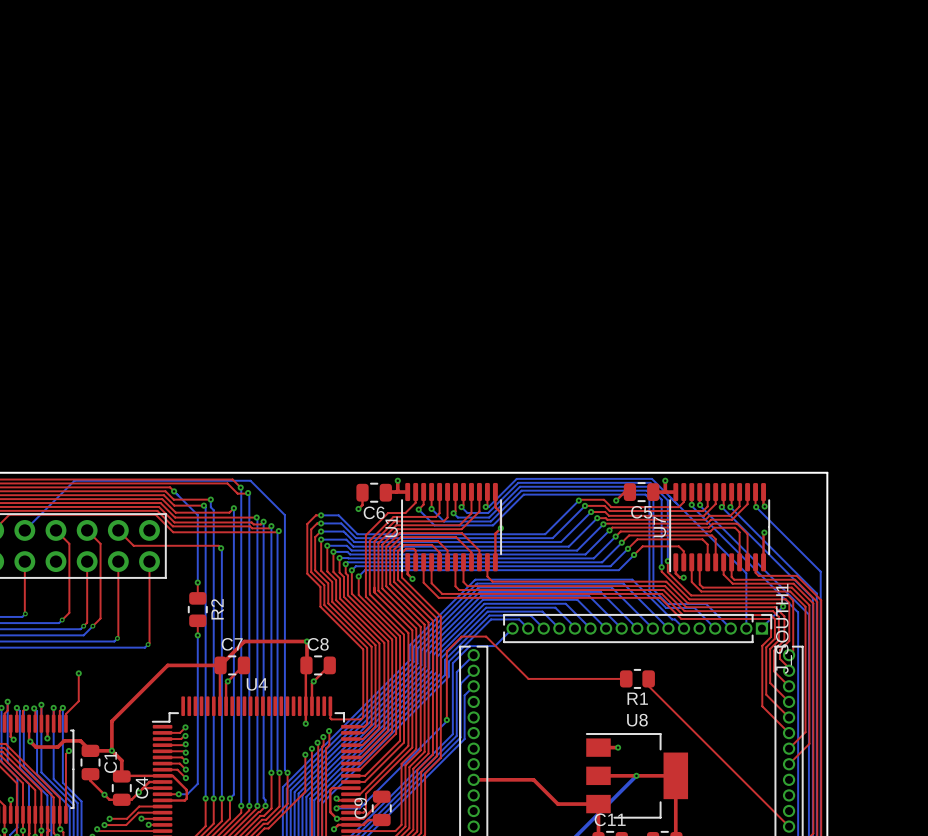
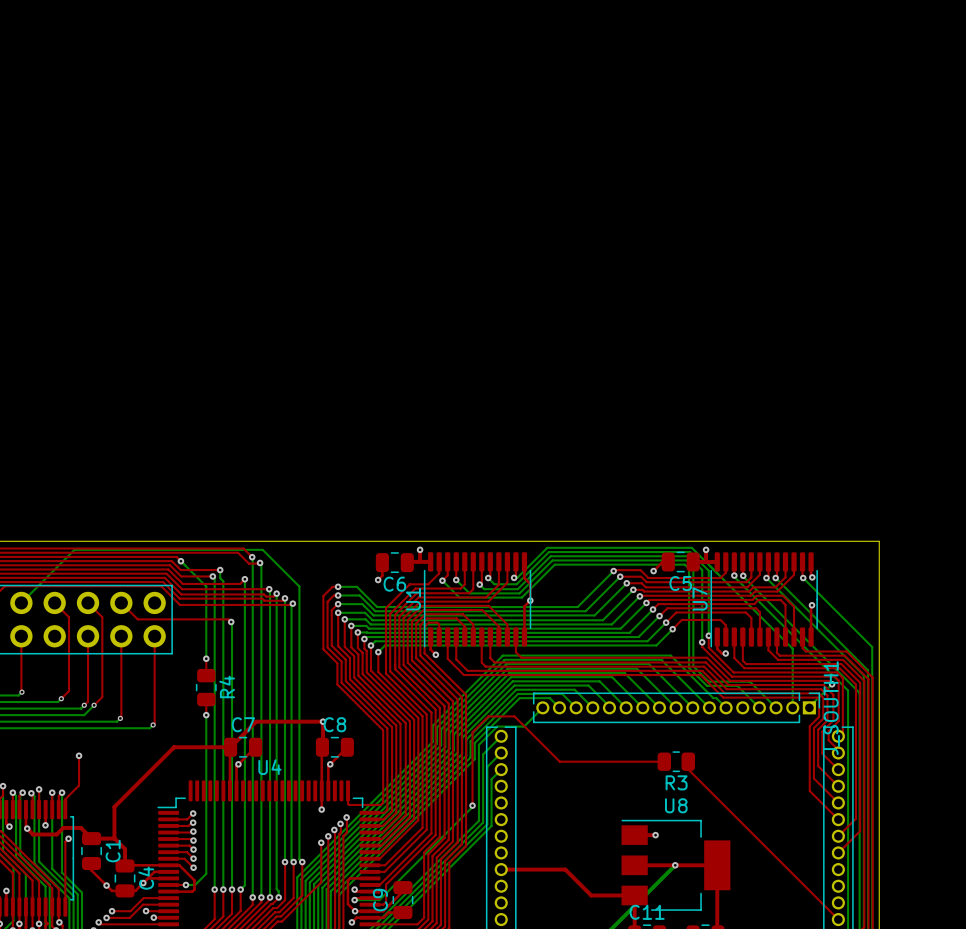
R2 name: R2 (217, 609) -> R4 (227, 686)
R1 name: R1 (637, 698) -> R3 (676, 782)
via: (111, 750) -> none

